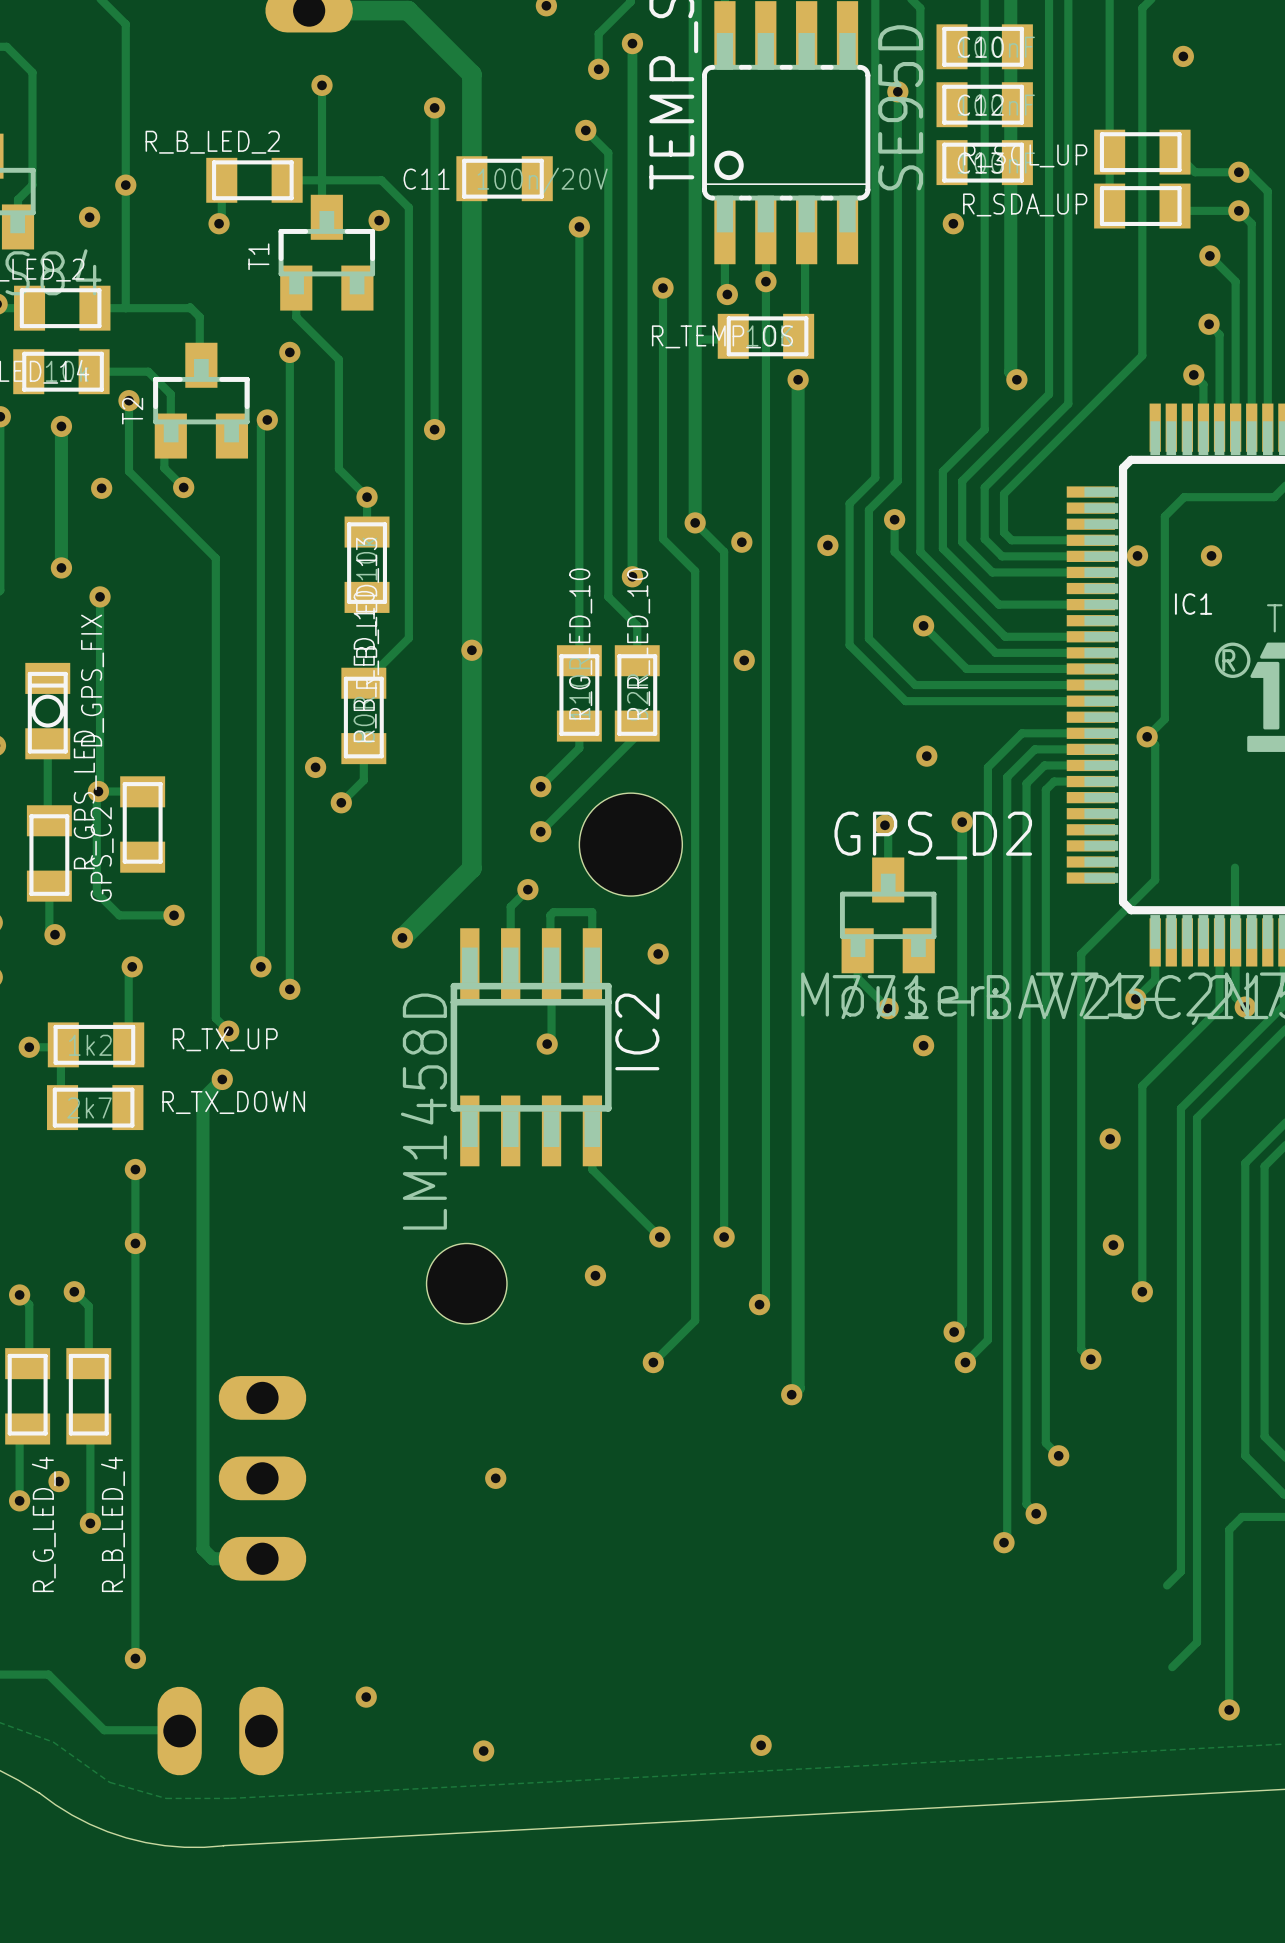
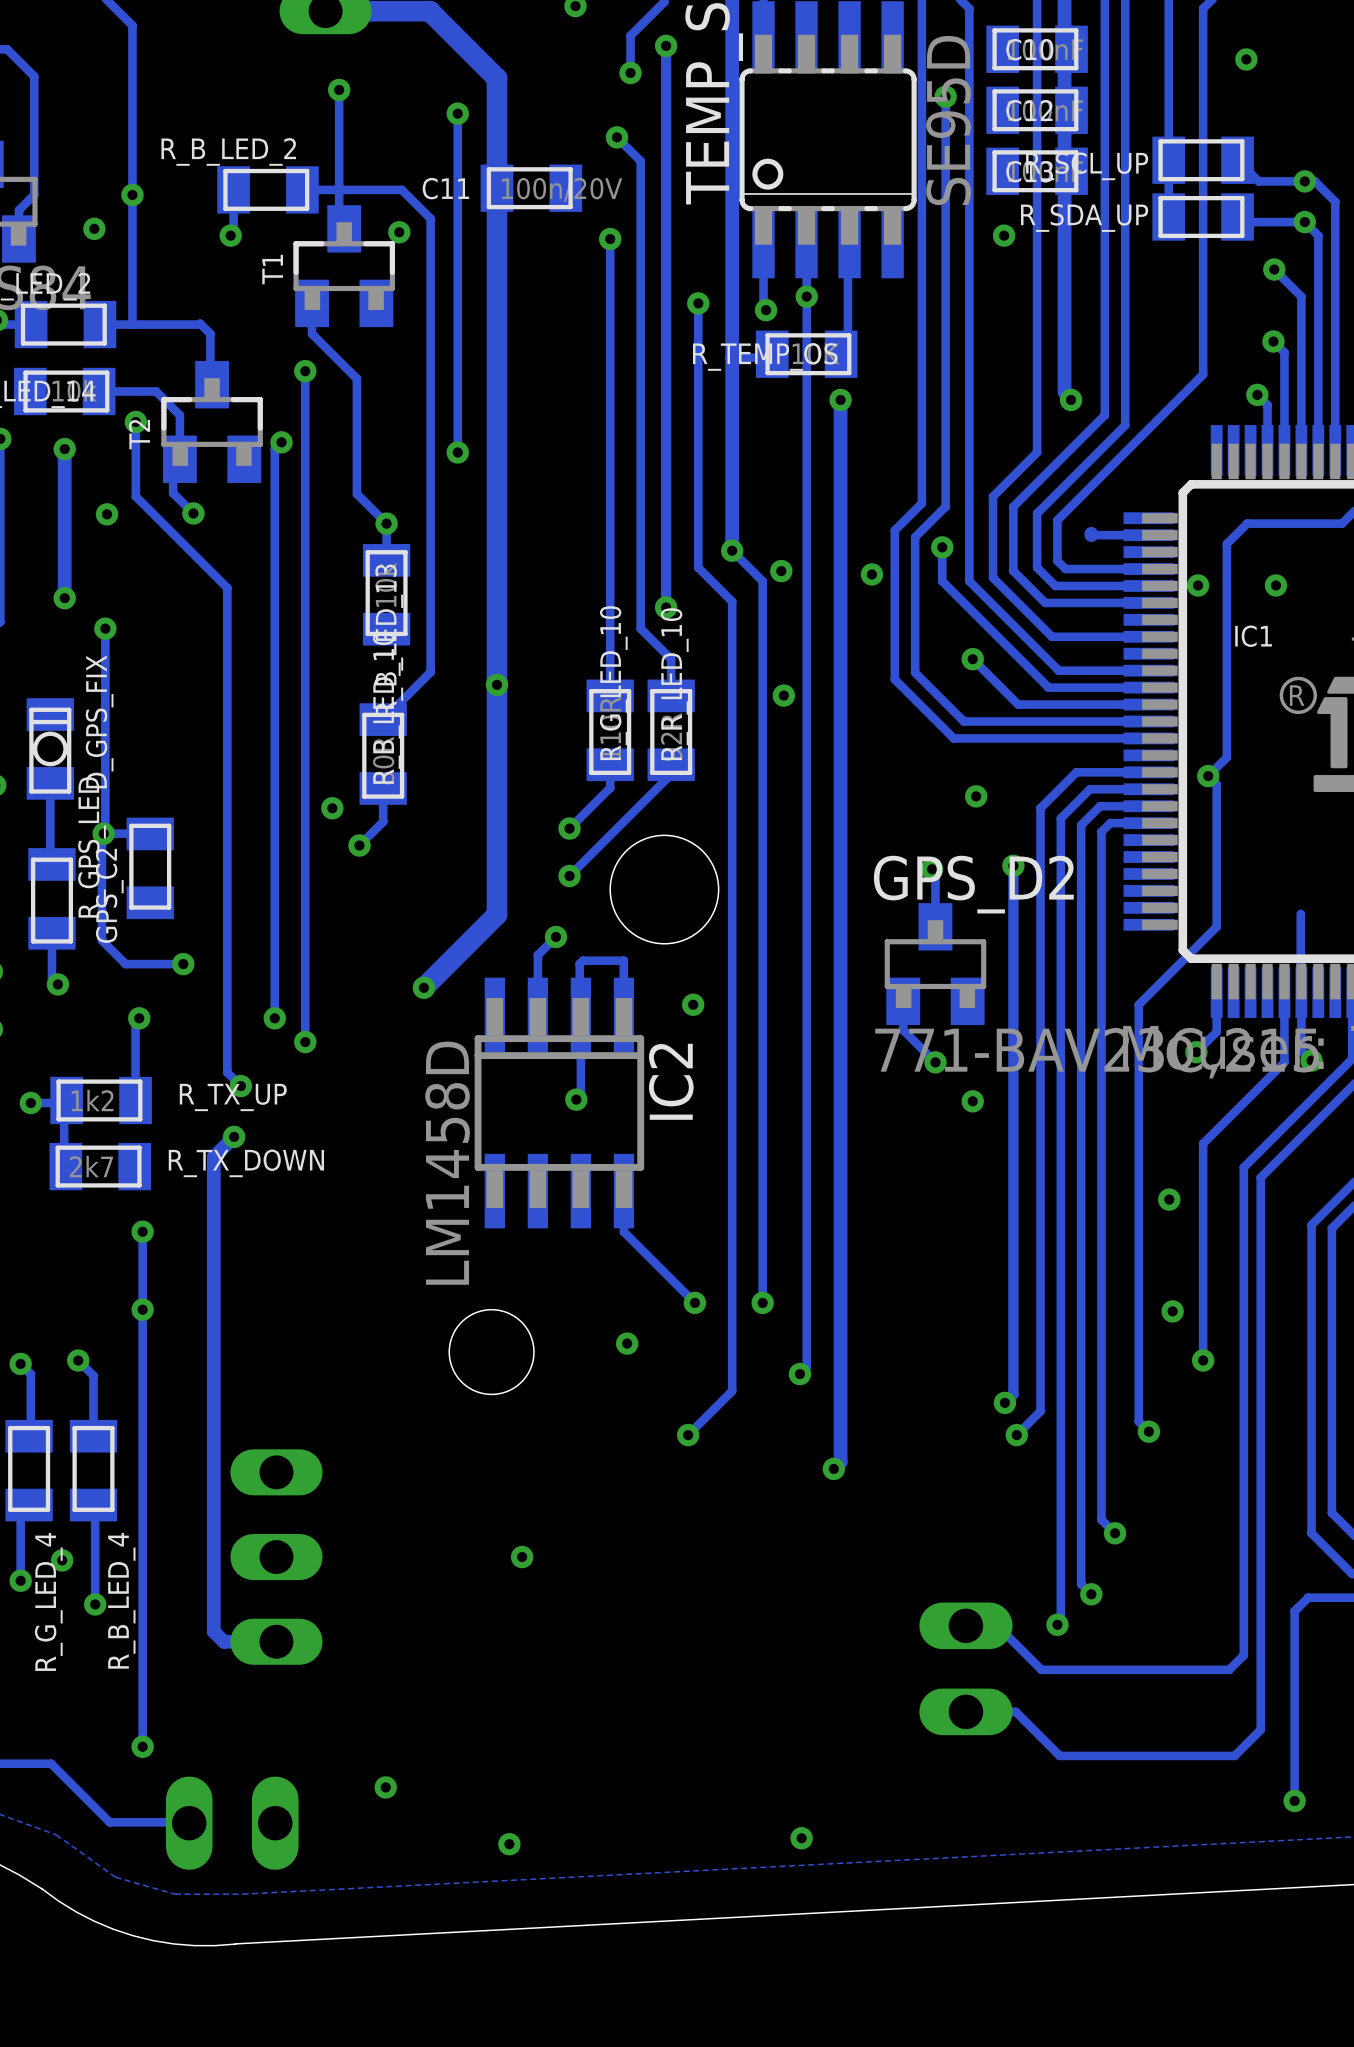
track: none -> (1091, 533) (1148, 535)
track: none -> (965, 1625) (997, 1625) (1041, 1669) (1229, 1669)
part: none -> (965, 1668)
track: none -> (965, 1711) (1015, 1711) (1059, 1755) (1234, 1755)

